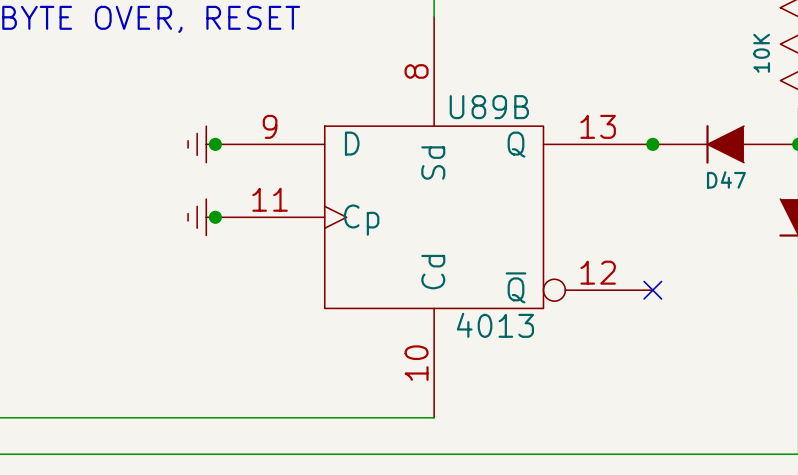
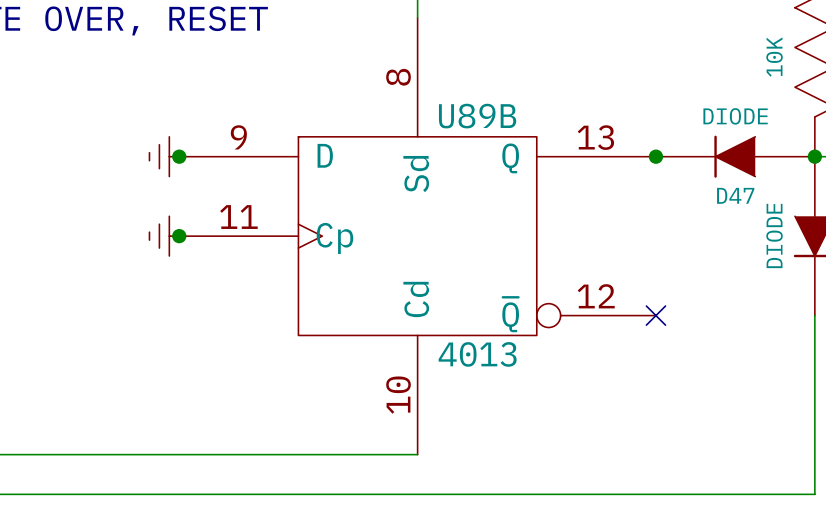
D47 value: none -> DIODE (735, 116)
part value: none -> DIODE (774, 235)

